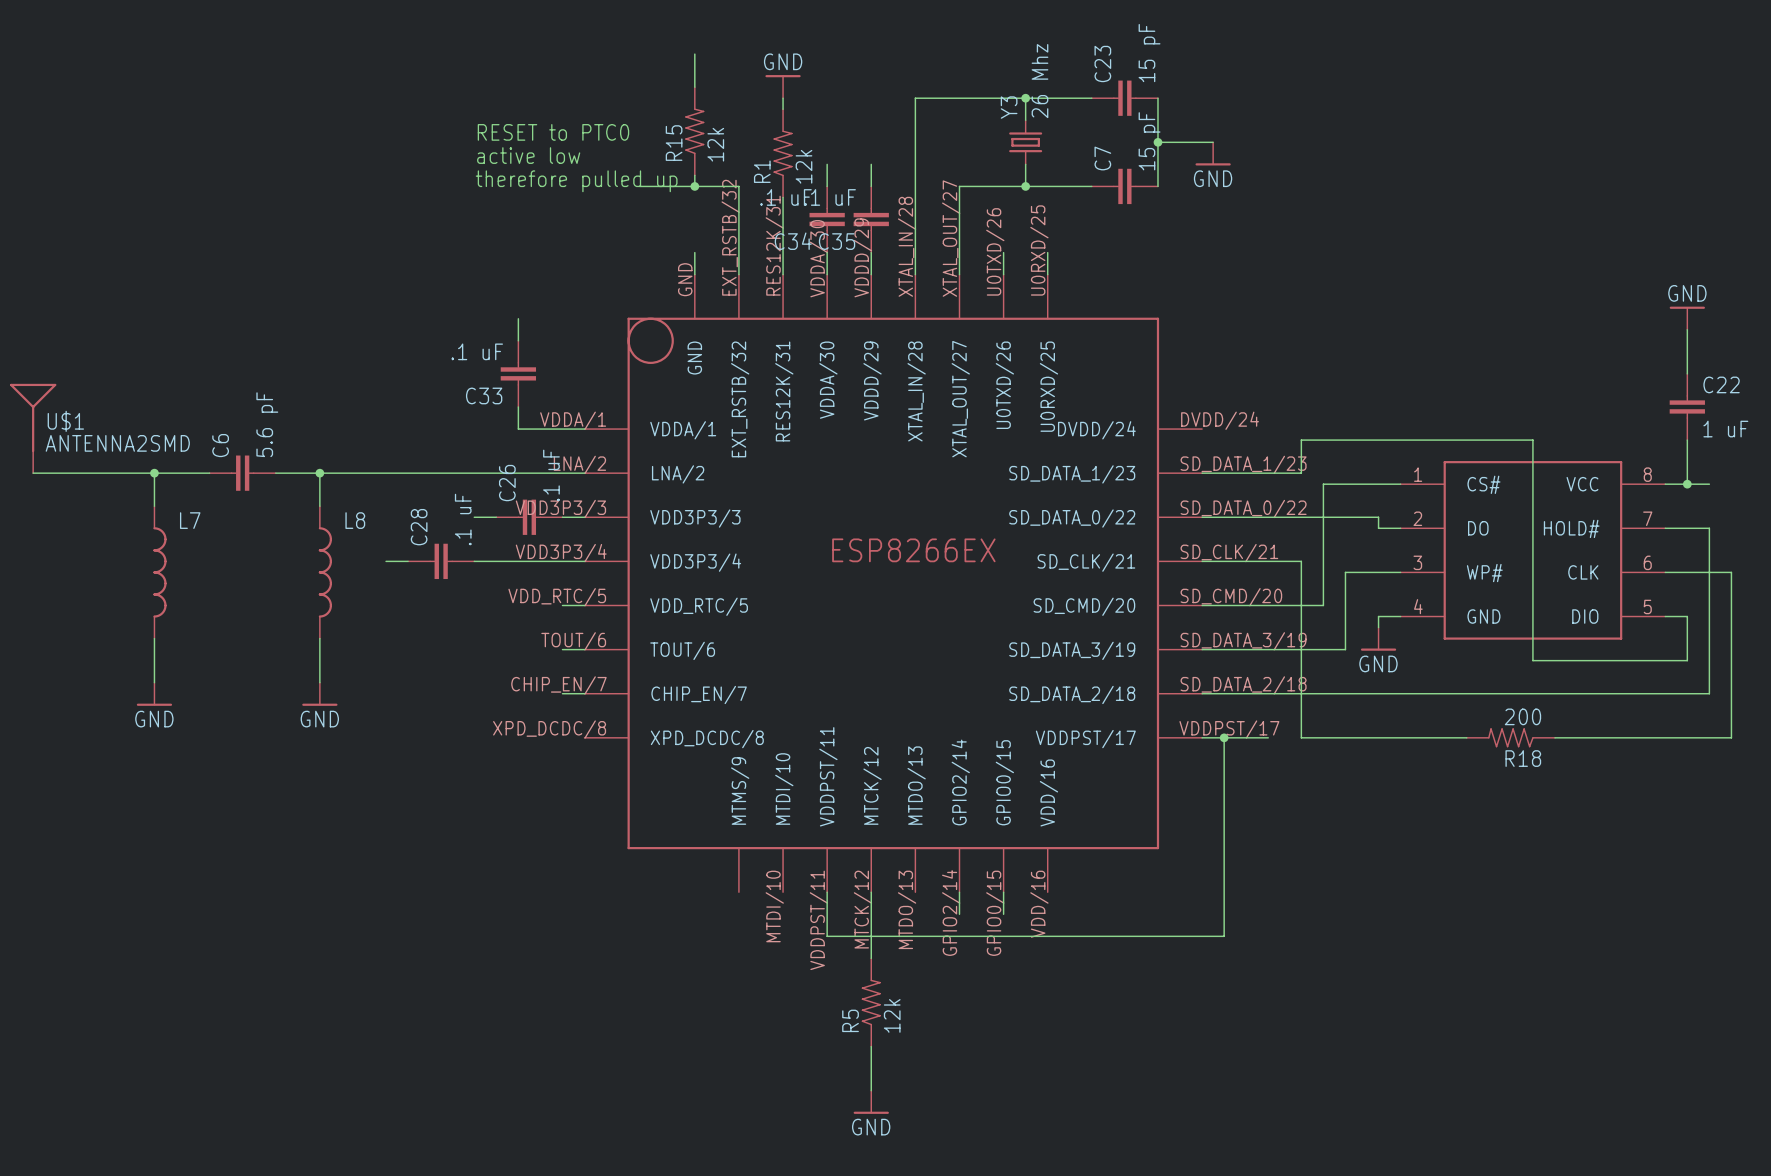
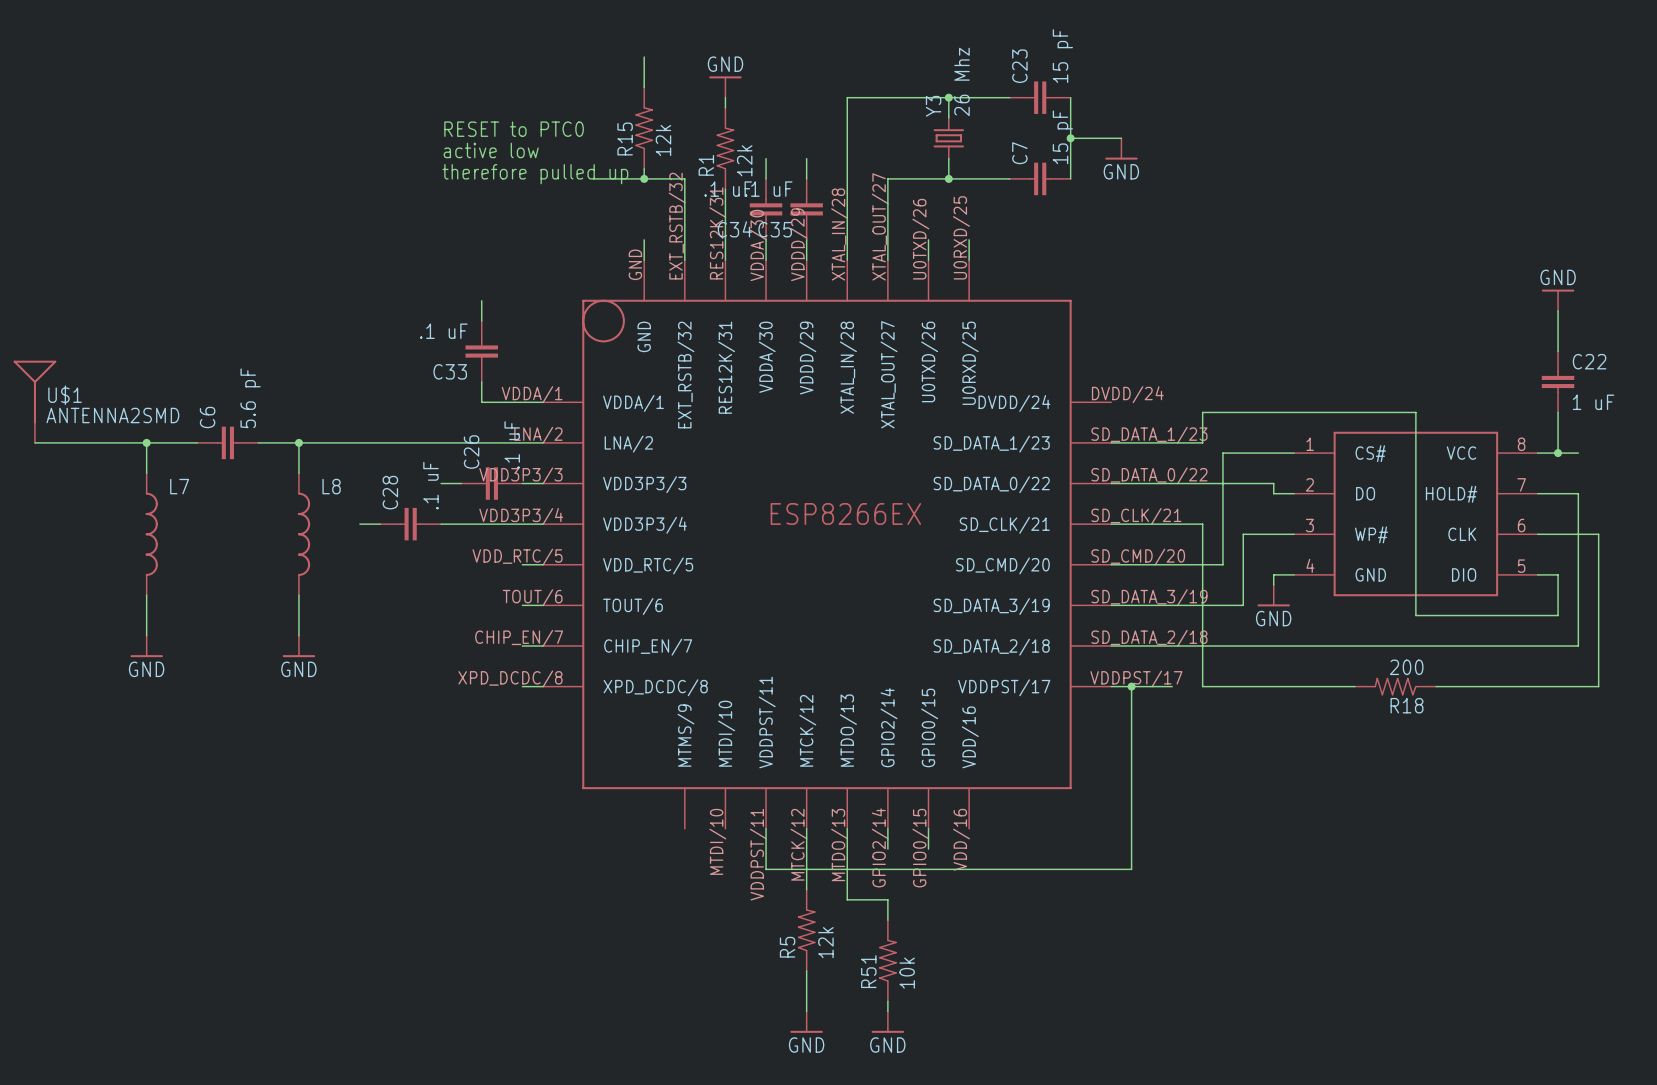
wire: none -> (522, 686) (542, 686)
wire: none -> (847, 828) (847, 899) (887, 899) (887, 920)
R51: none -> 10k (887, 960)
wire: none -> (887, 1001) (887, 1011)
power symbol: none -> GND (887, 1022)

